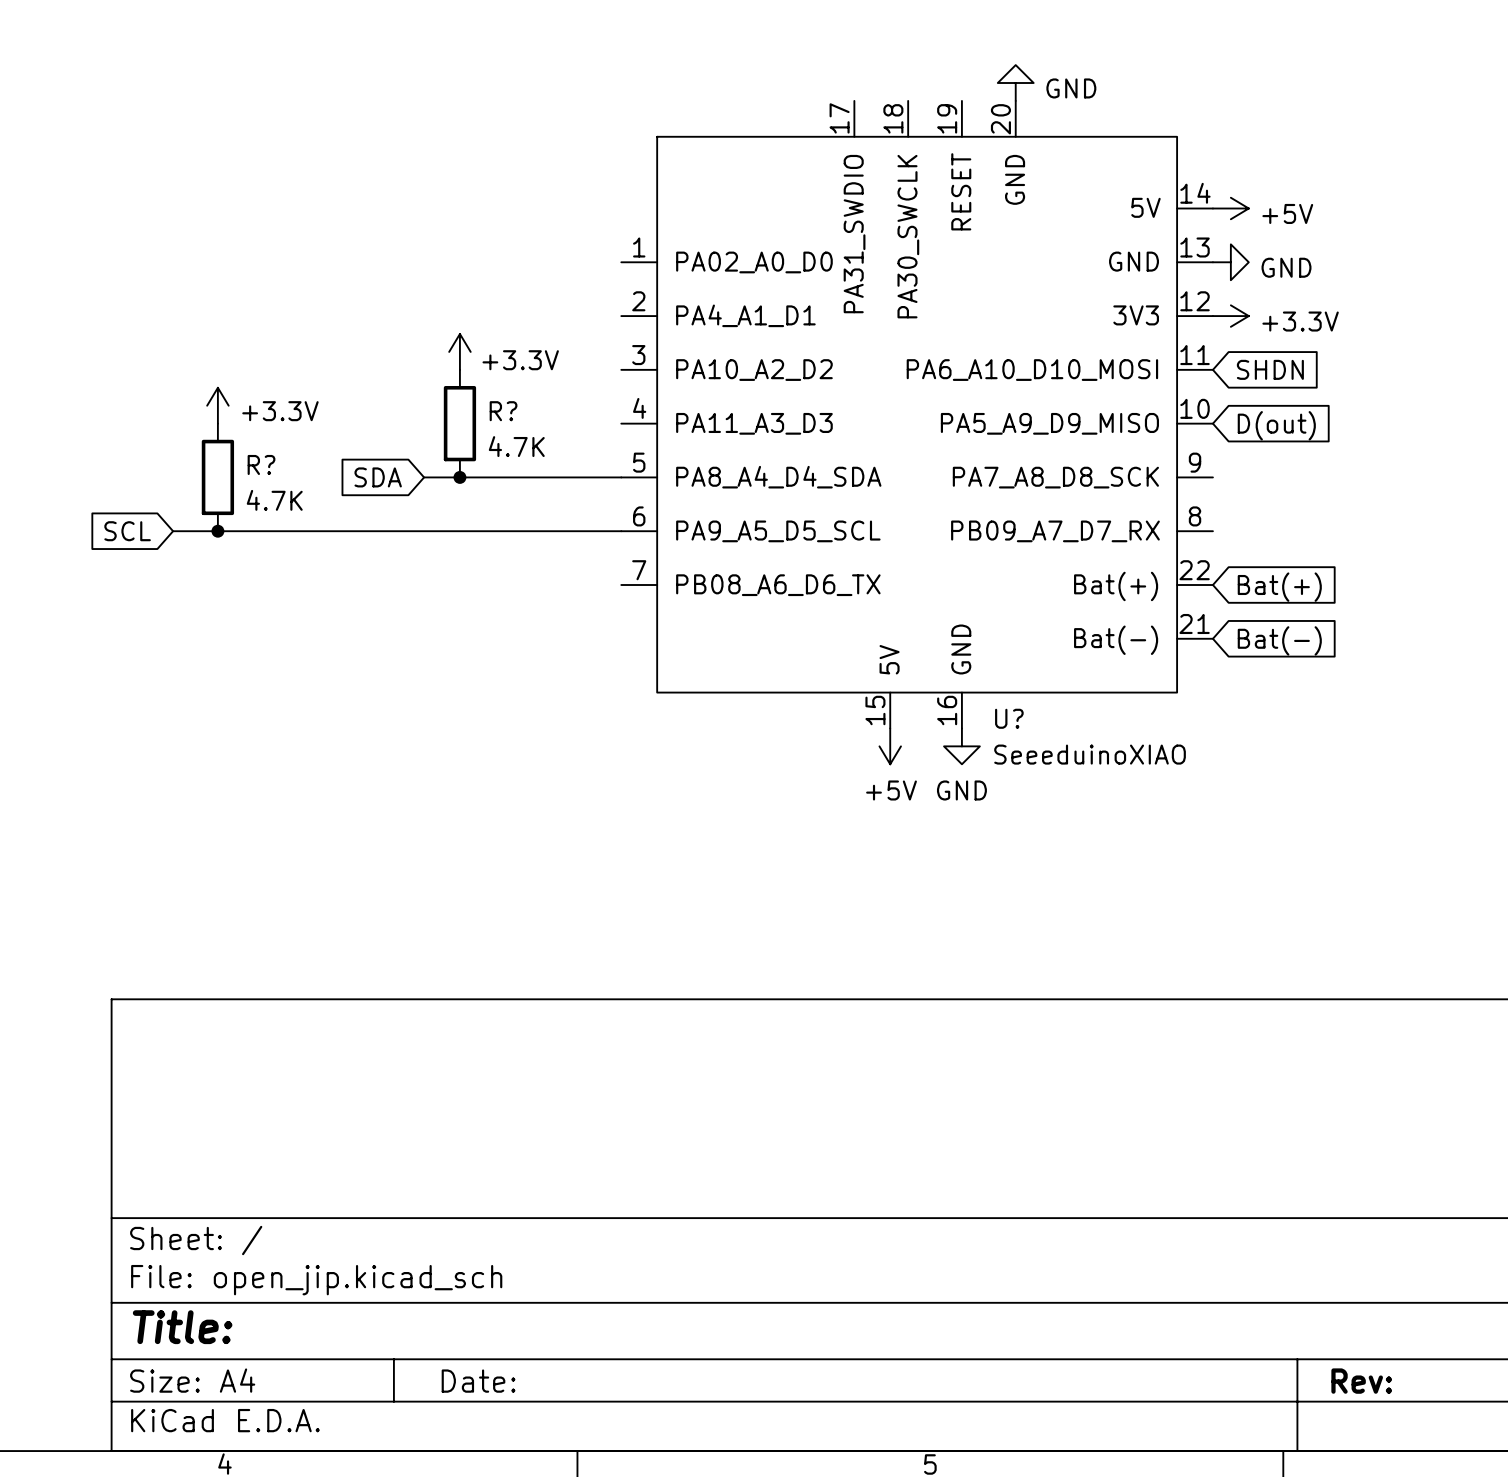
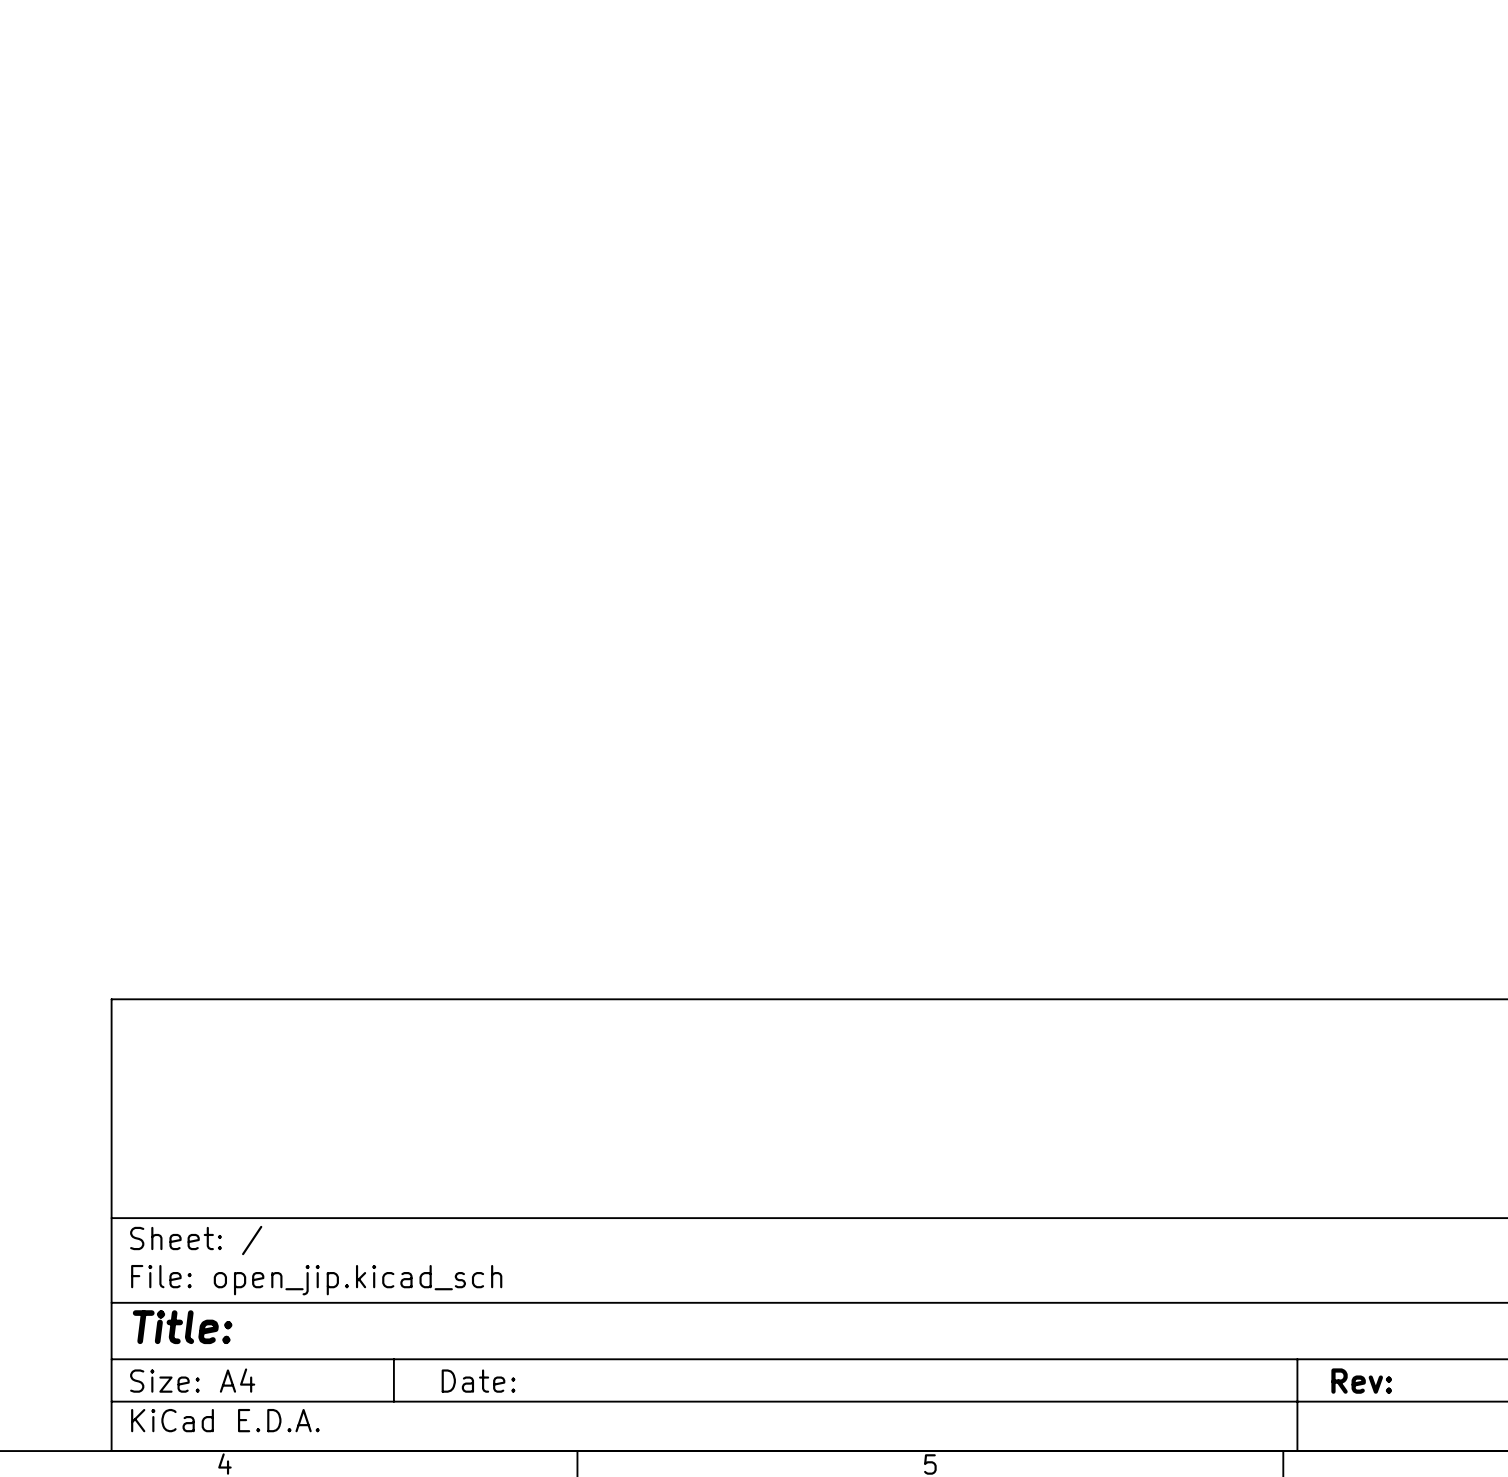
power symbol: GND (1015, 83) -> none
power symbol: +5V (1230, 208) -> none
power symbol: GND (1230, 262) -> none
power symbol: +3.3V (1230, 316) -> none
power symbol: +3.3V (459, 351) -> none
global label: SHDN (1270, 369) -> none
power symbol: +3.3V (217, 405) -> none
U?: SeeeduinoXIAO (917, 414) -> none
R?: 4.7K (459, 423) -> none
global label: D(out) (1276, 425) -> none
R?: 4.7K (217, 477) -> none
global label: SDA (378, 477) -> none
wire: (424, 477) (621, 477) -> none
junction: (459, 477) -> none
global label: SCL (127, 531) -> none
wire: (173, 531) (621, 531) -> none
junction: (217, 531) -> none
global label: Bat(+) (1279, 587) -> none
global label: Bat(-) (1279, 640) -> none
power symbol: +5V (890, 746) -> none
power symbol: GND (961, 746) -> none

